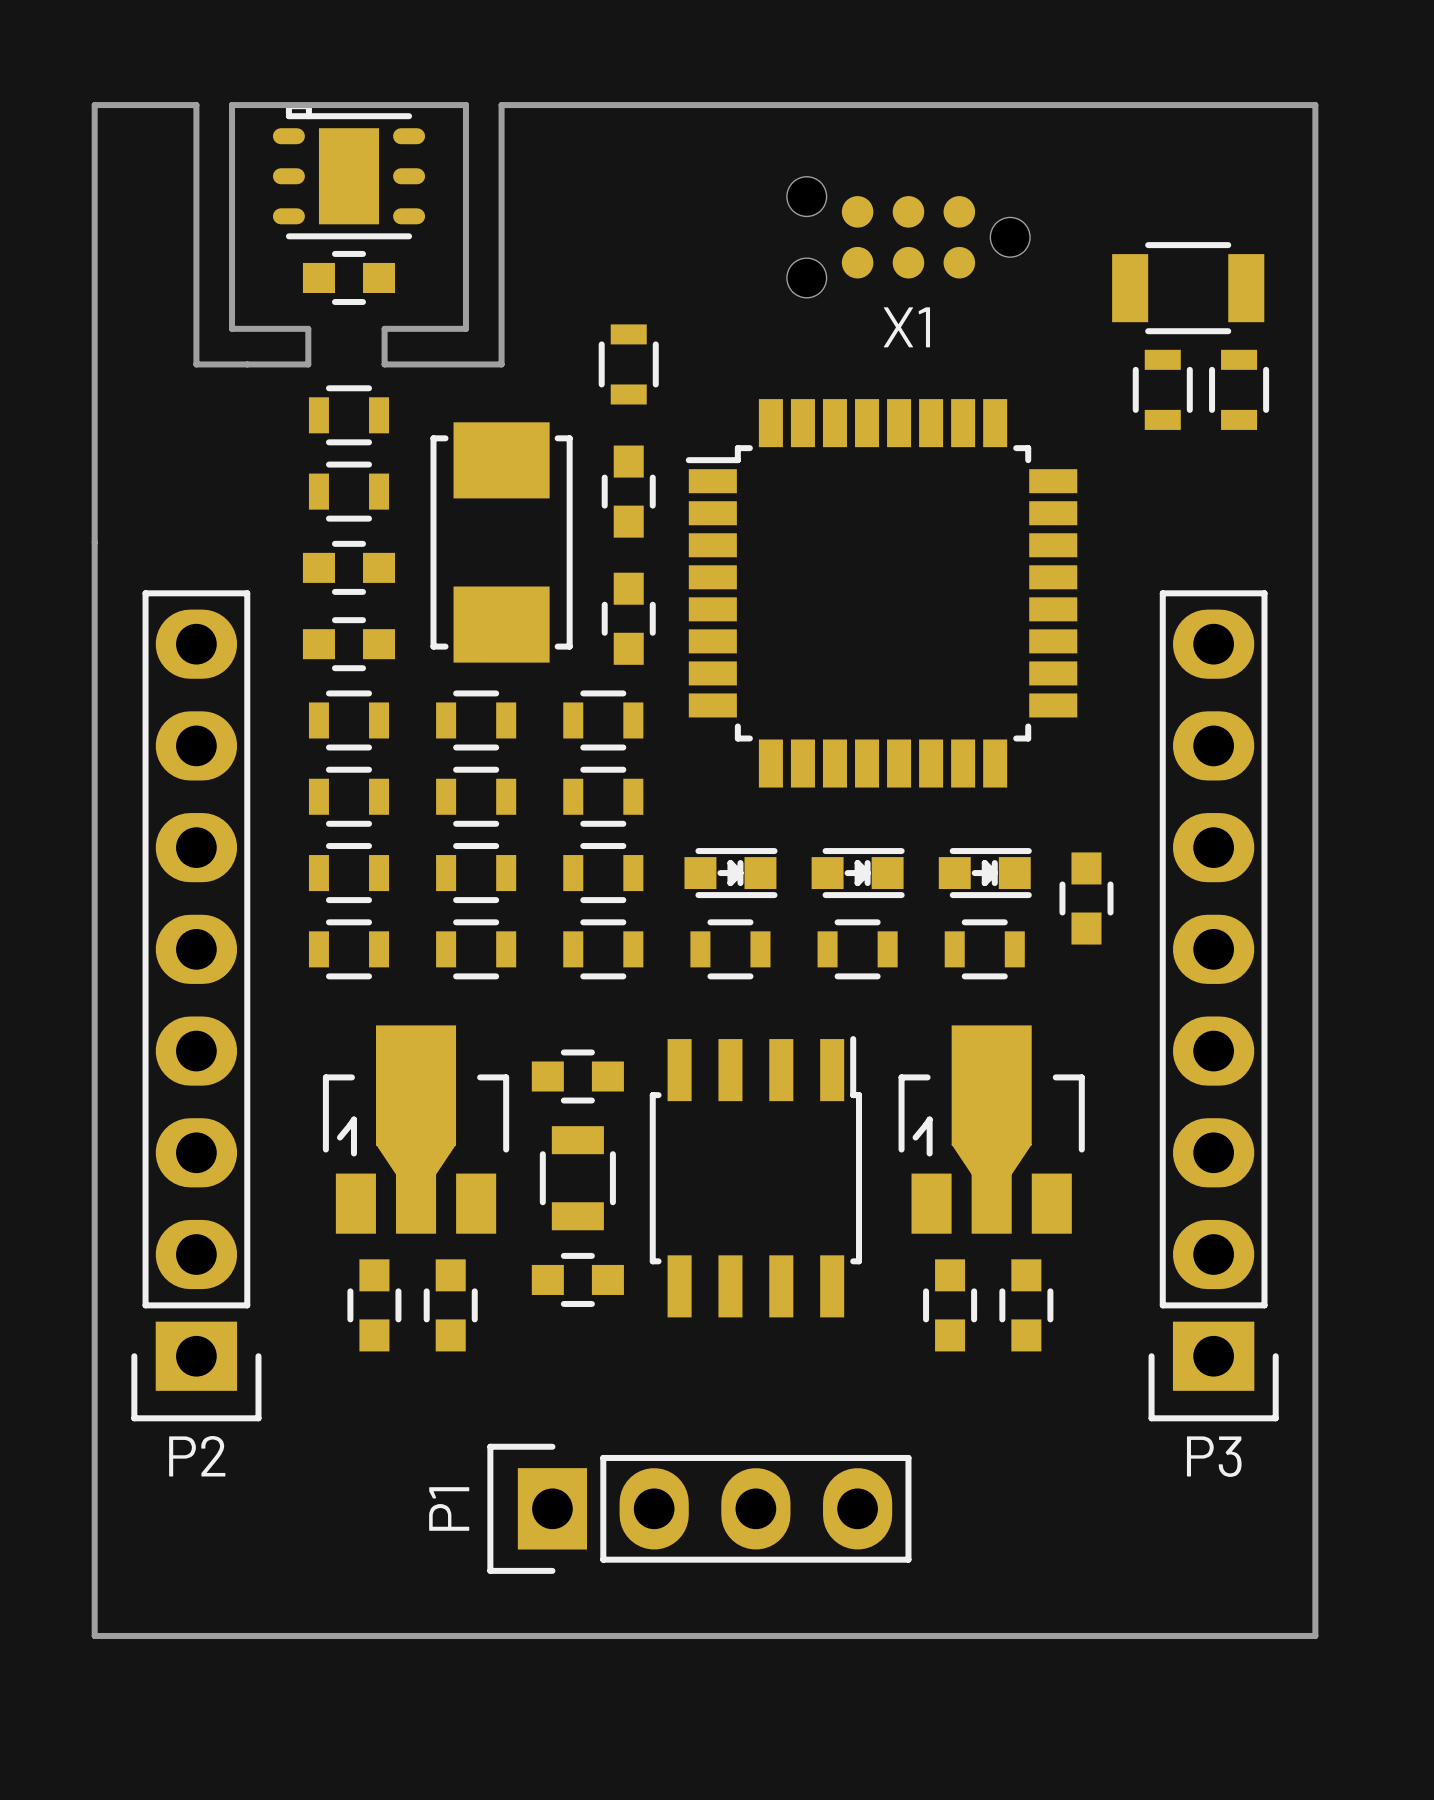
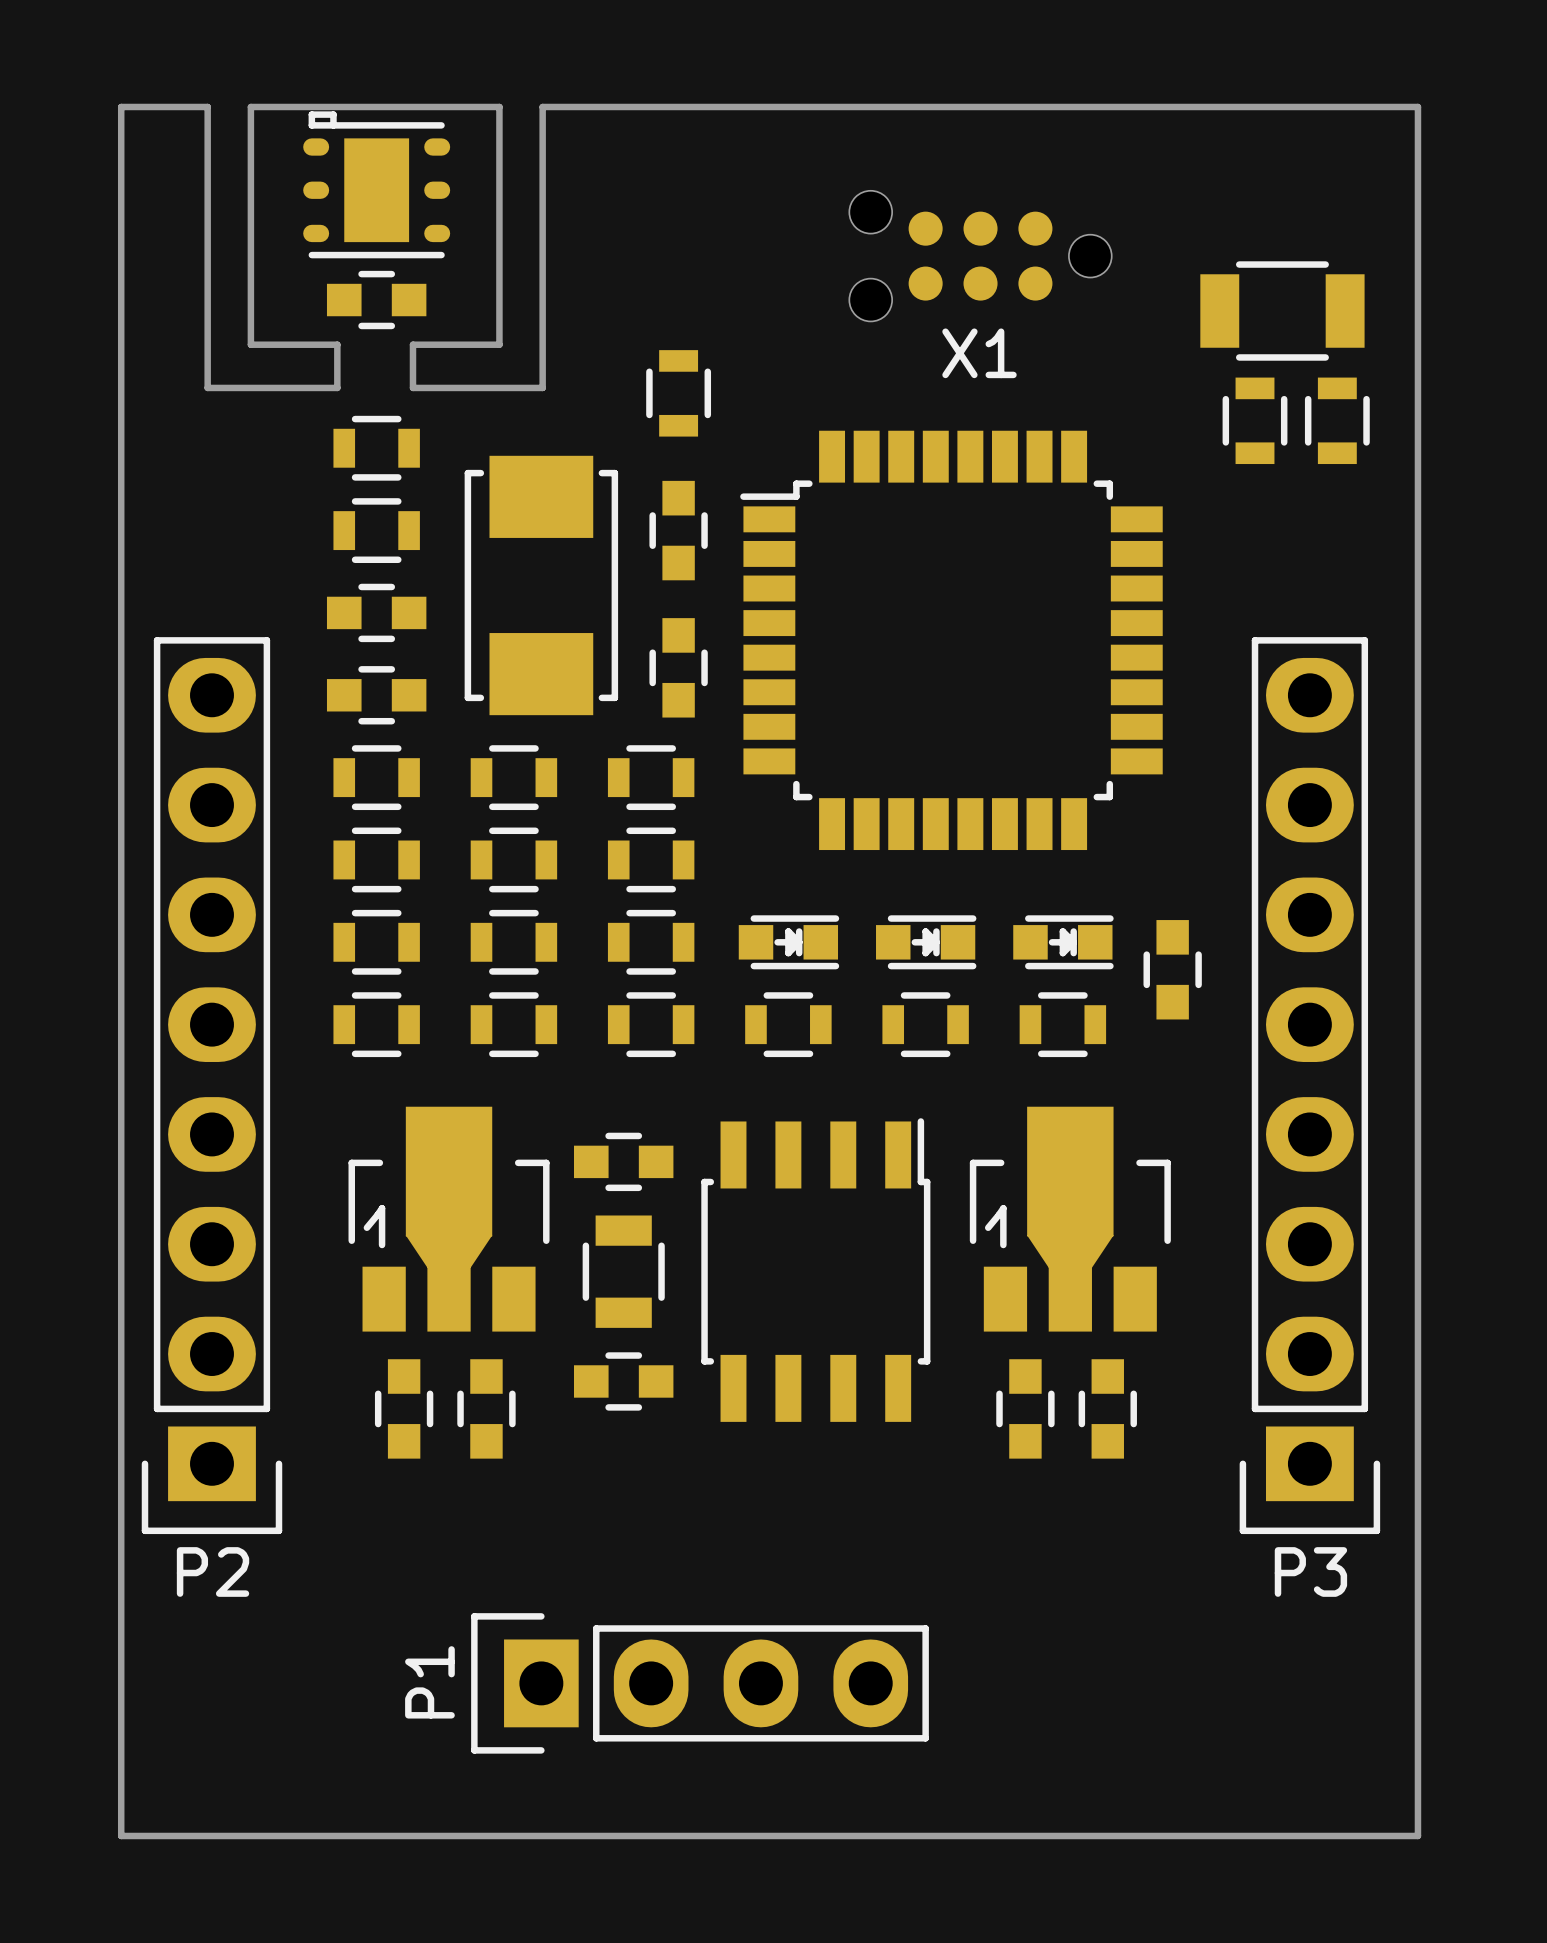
part footprint: [272, 103, 426, 240] -> [303, 111, 451, 259]
board edge: (94, 105) (94, 1635) (1315, 1635) (1315, 105) (501, 105) (501, 364) (384, 364) (384, 328) (465, 328) (465, 105) (232, 105) (232, 328) (308, 328) (308, 364) (196, 364) (196, 105) (94, 105) -> (121, 106) (121, 1835) (1417, 1835) (1417, 106) (542, 106) (542, 387) (412, 387) (412, 344) (499, 344) (499, 106) (250, 106) (250, 344) (337, 344) (337, 387) (207, 387) (207, 106) (121, 106)
P1 position: (699, 1508) -> (700, 1683)

